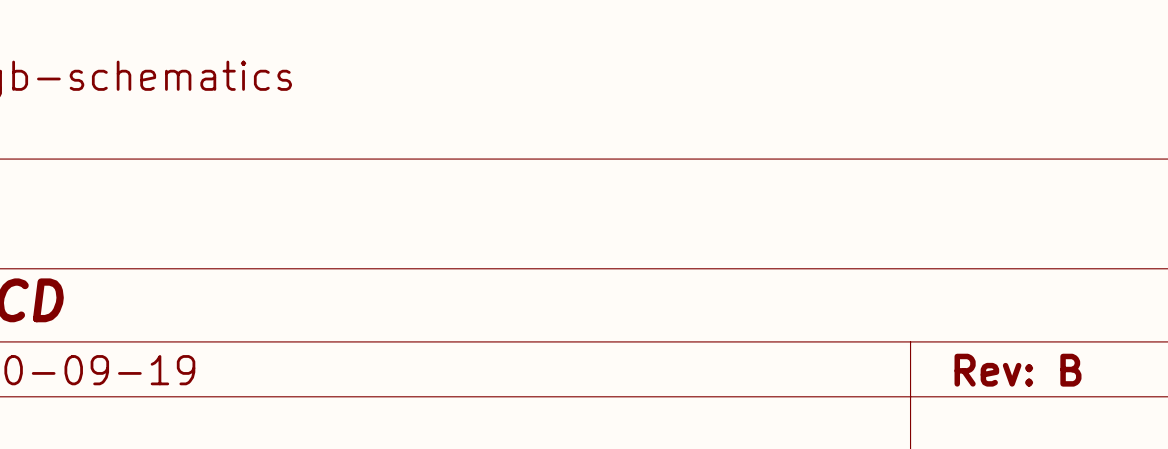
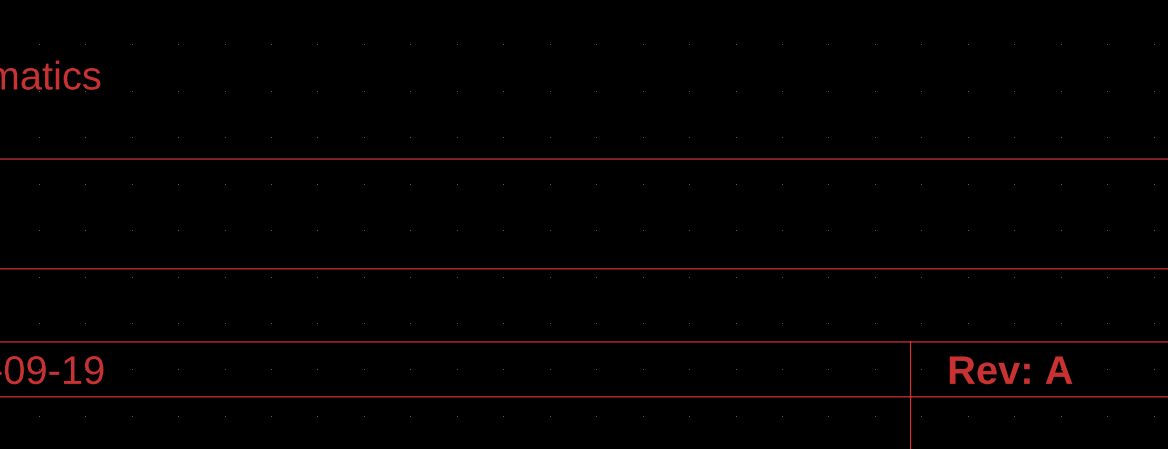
title block: Rev: B (1018, 370) -> Rev: A (1011, 370)

